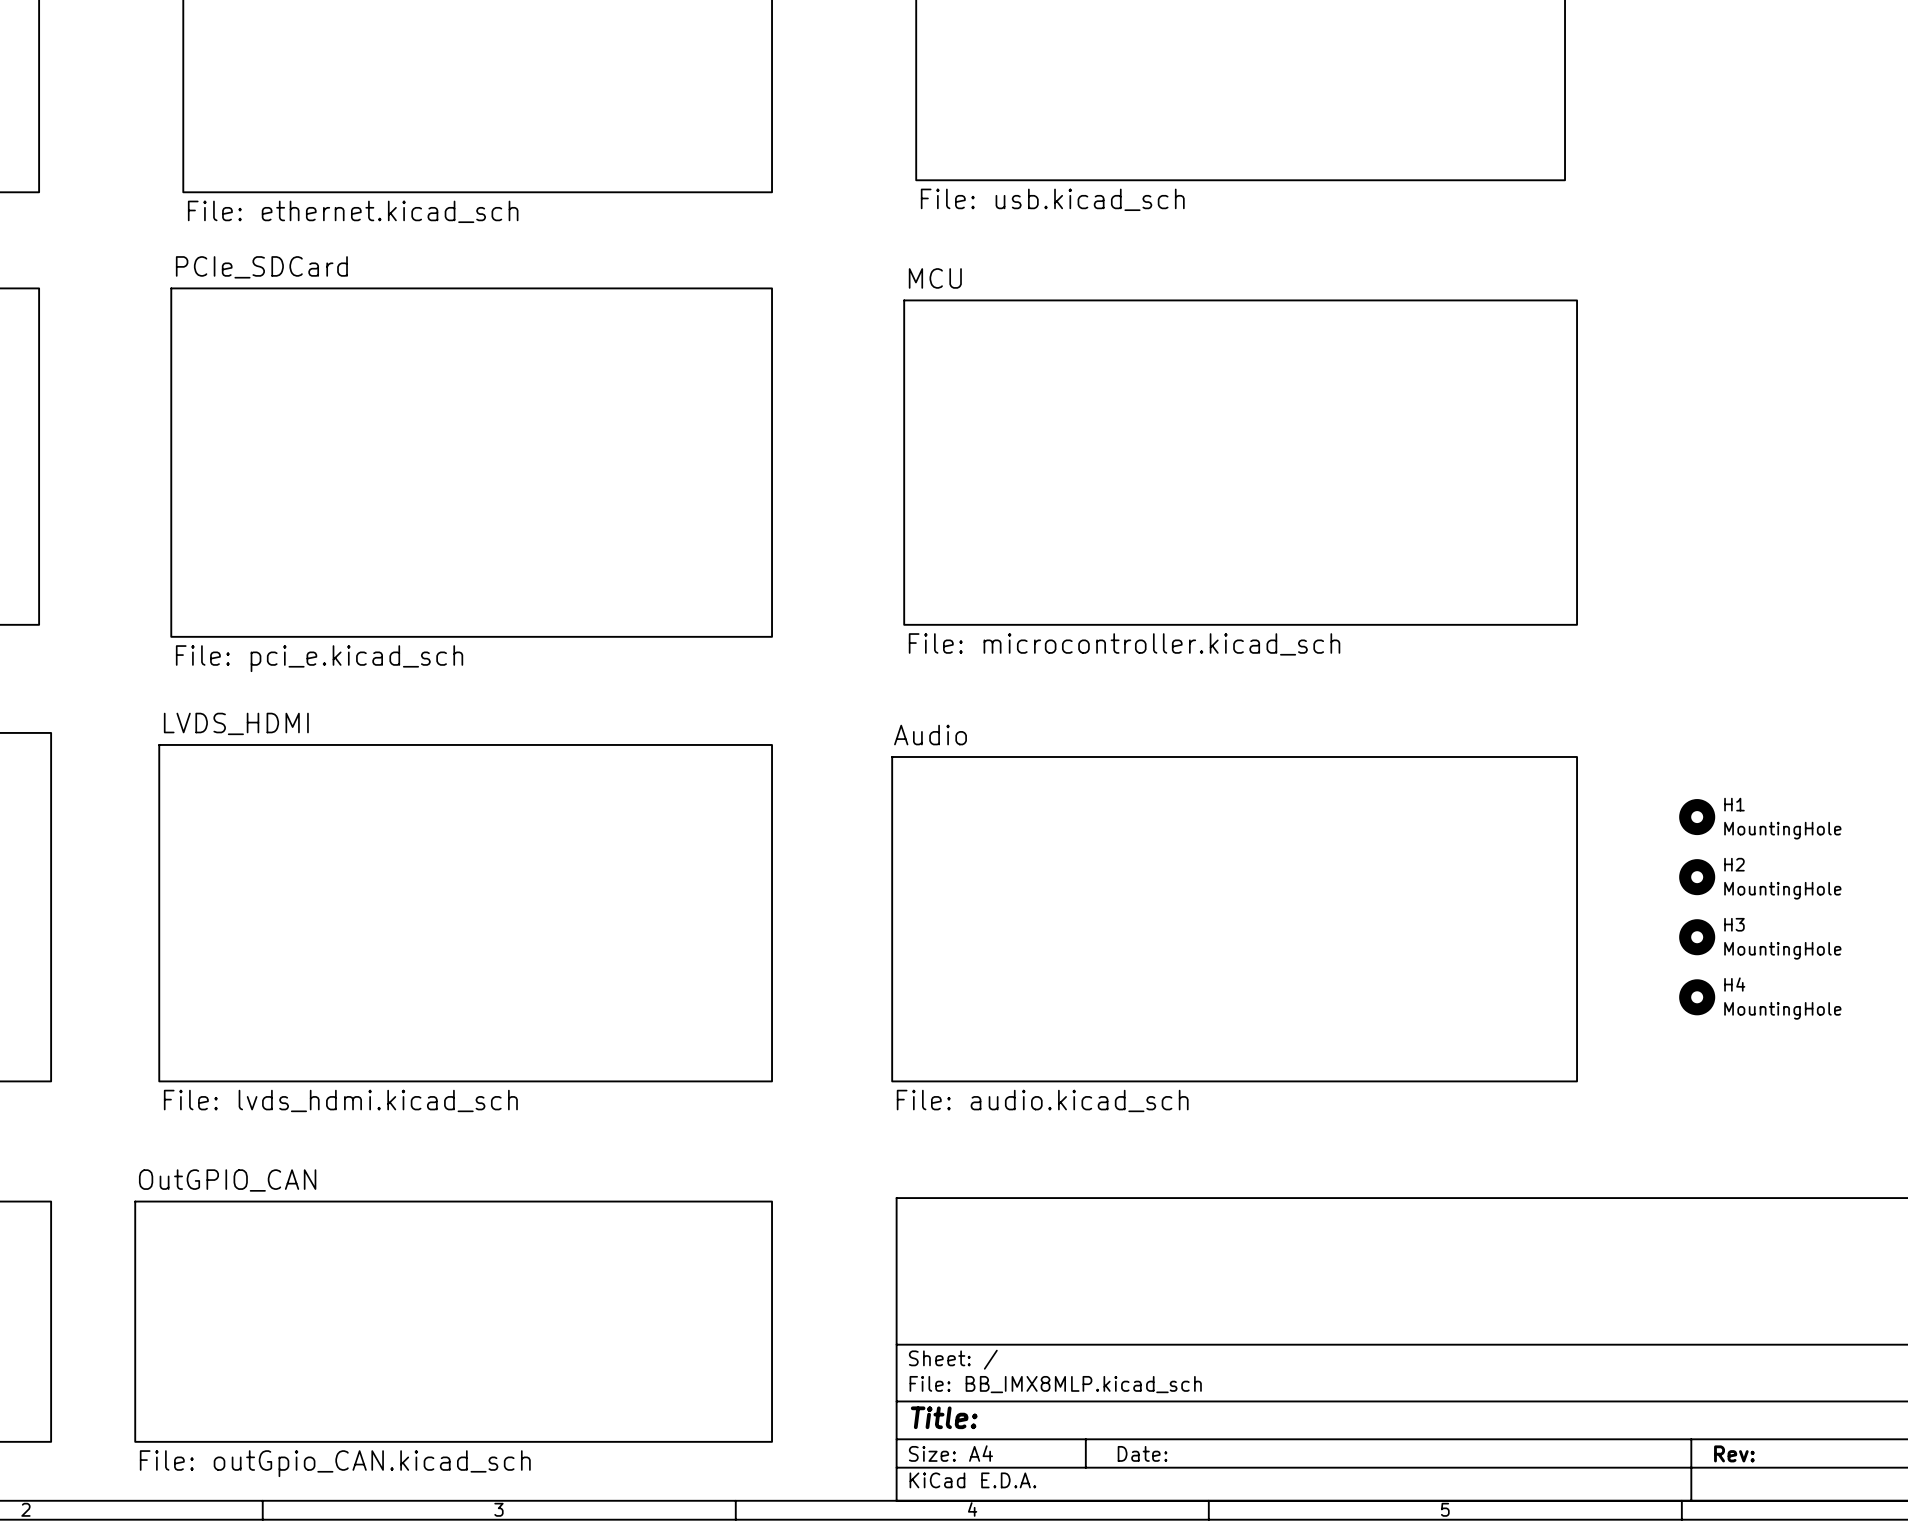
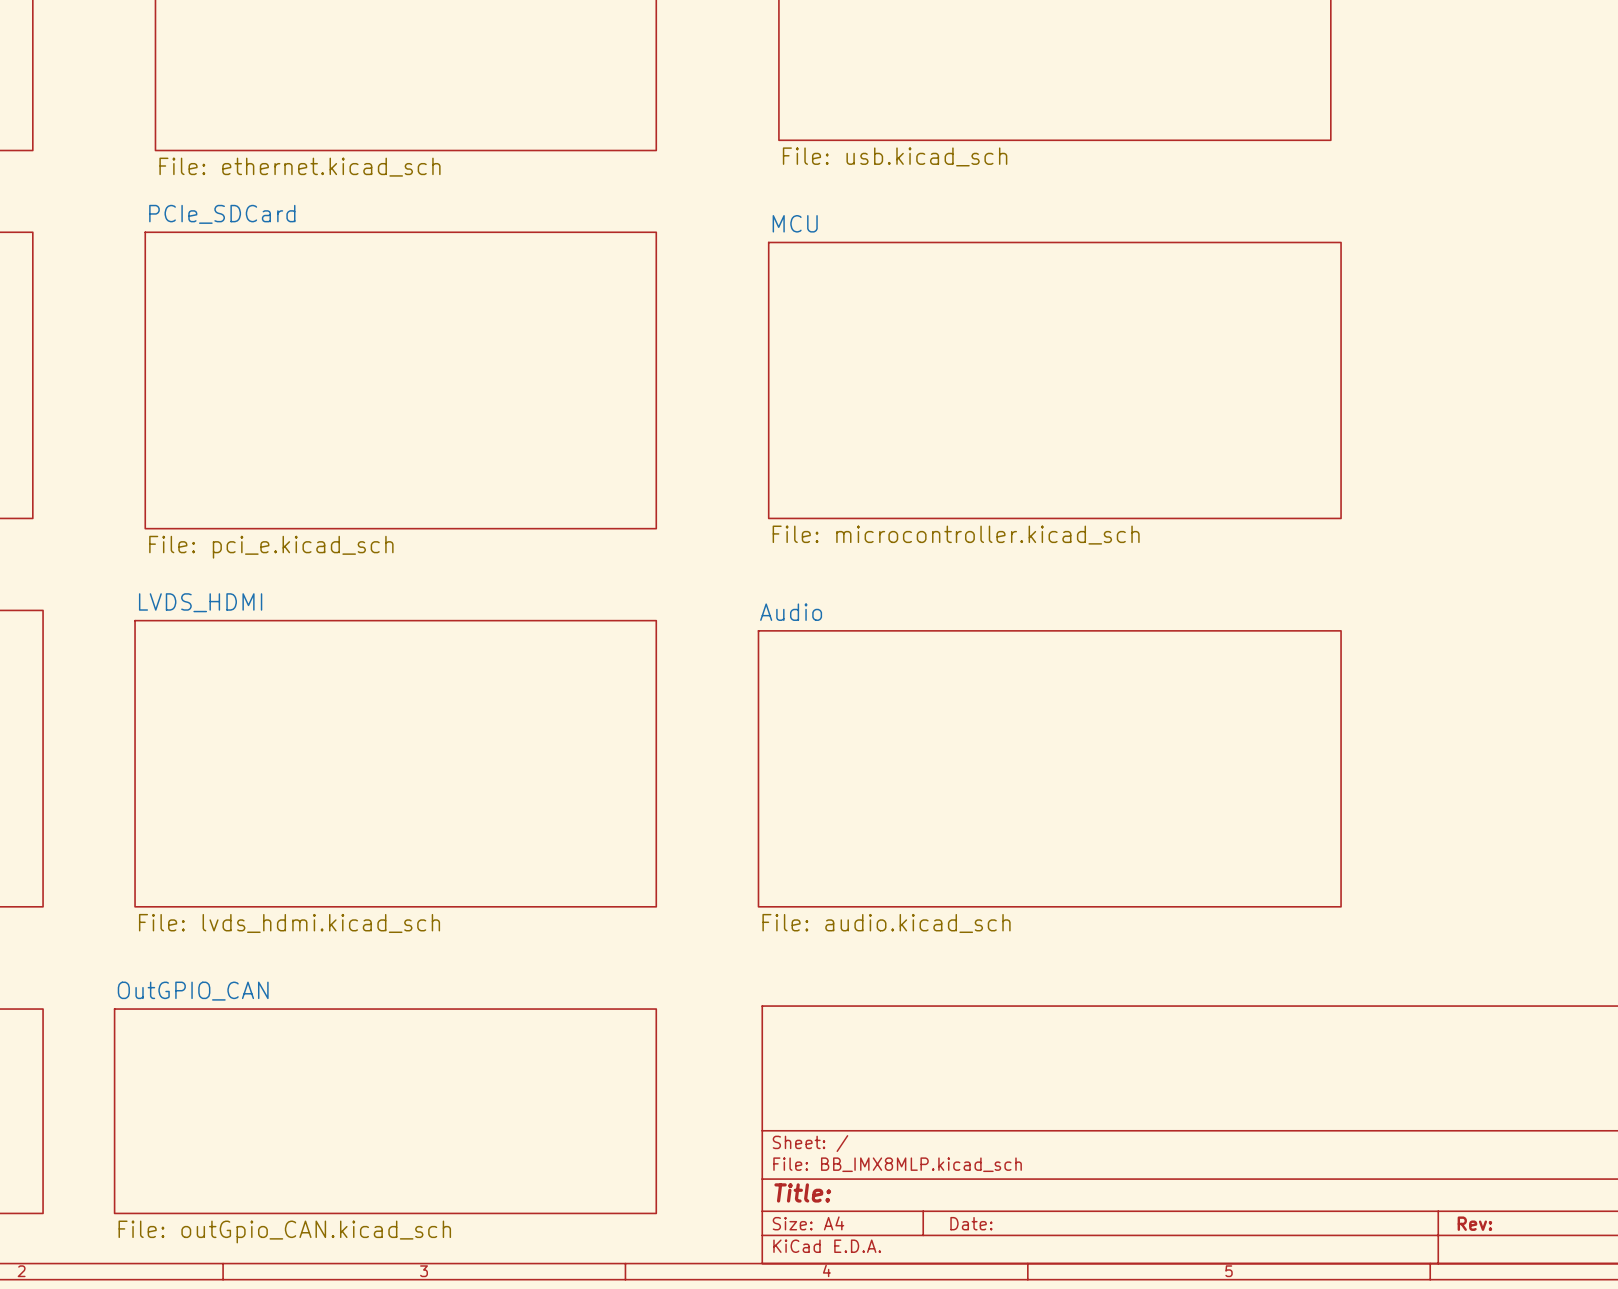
H1: MountingHole (1697, 817) -> none
H2: MountingHole (1697, 877) -> none
H3: MountingHole (1697, 937) -> none
H4: MountingHole (1697, 997) -> none

